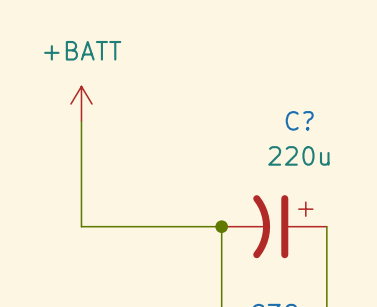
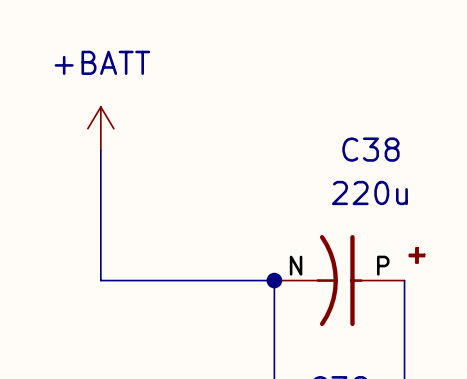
C?: 220u (274, 226) -> none
C38: none -> 220u (349, 280)

